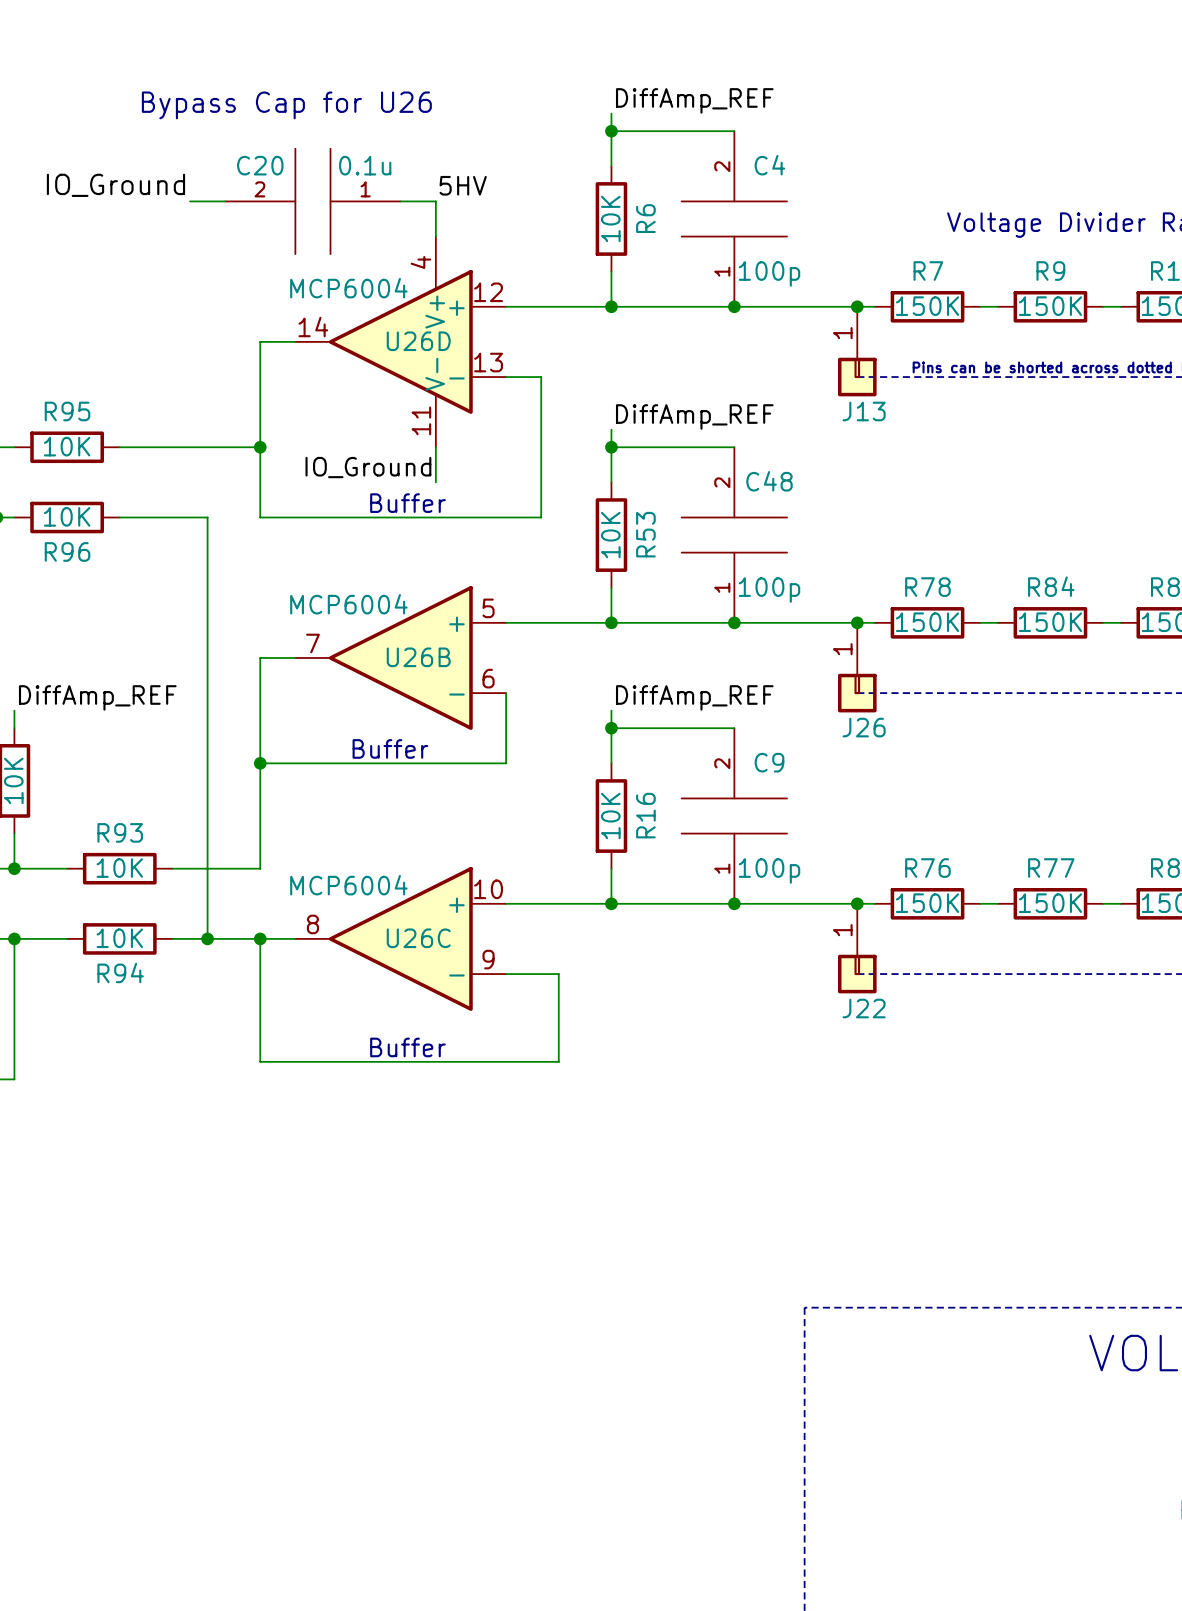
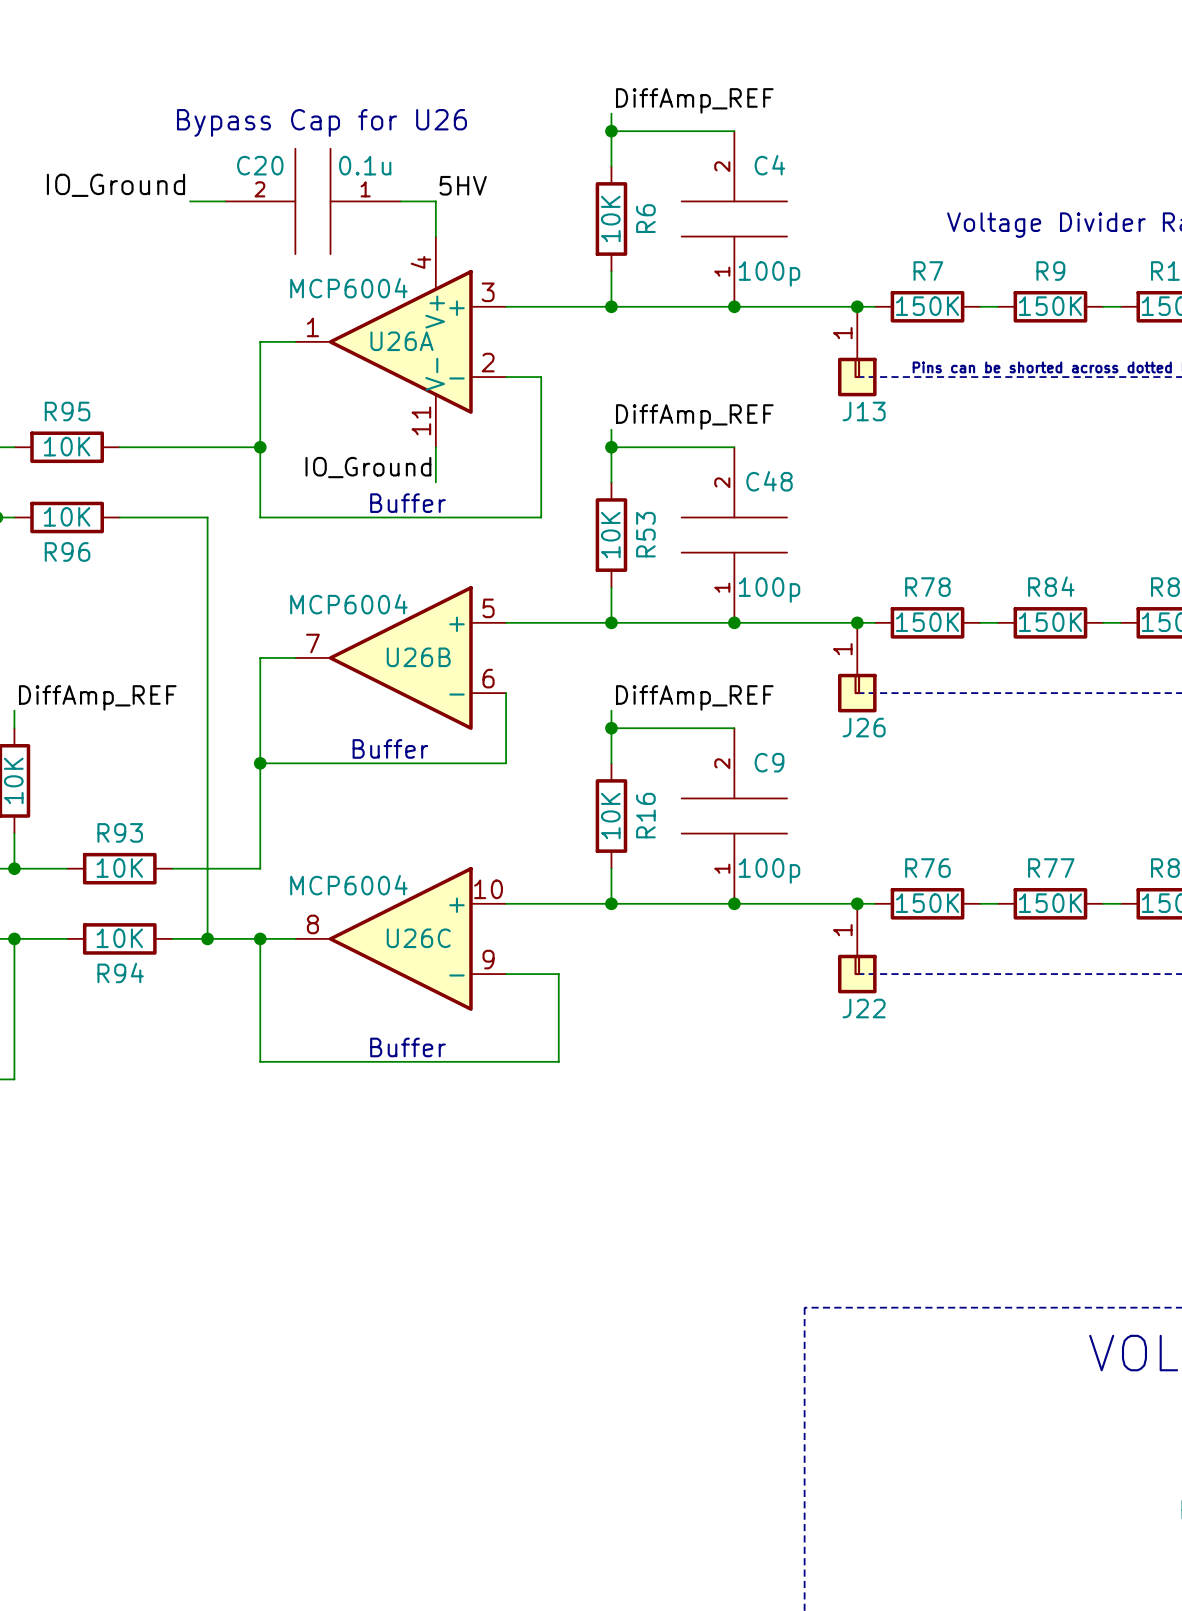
text position: Bypass Cap for U26 (286, 105) -> Bypass Cap for U26 (321, 122)
U26D pin number: 12 (488, 292) -> 3 (488, 292)
U26D pin number: 14 (313, 327) -> 1 (312, 327)
U26D name: U26D (418, 341) -> U26A (401, 341)
U26D pin number: 13 (488, 362) -> 2 (488, 362)

